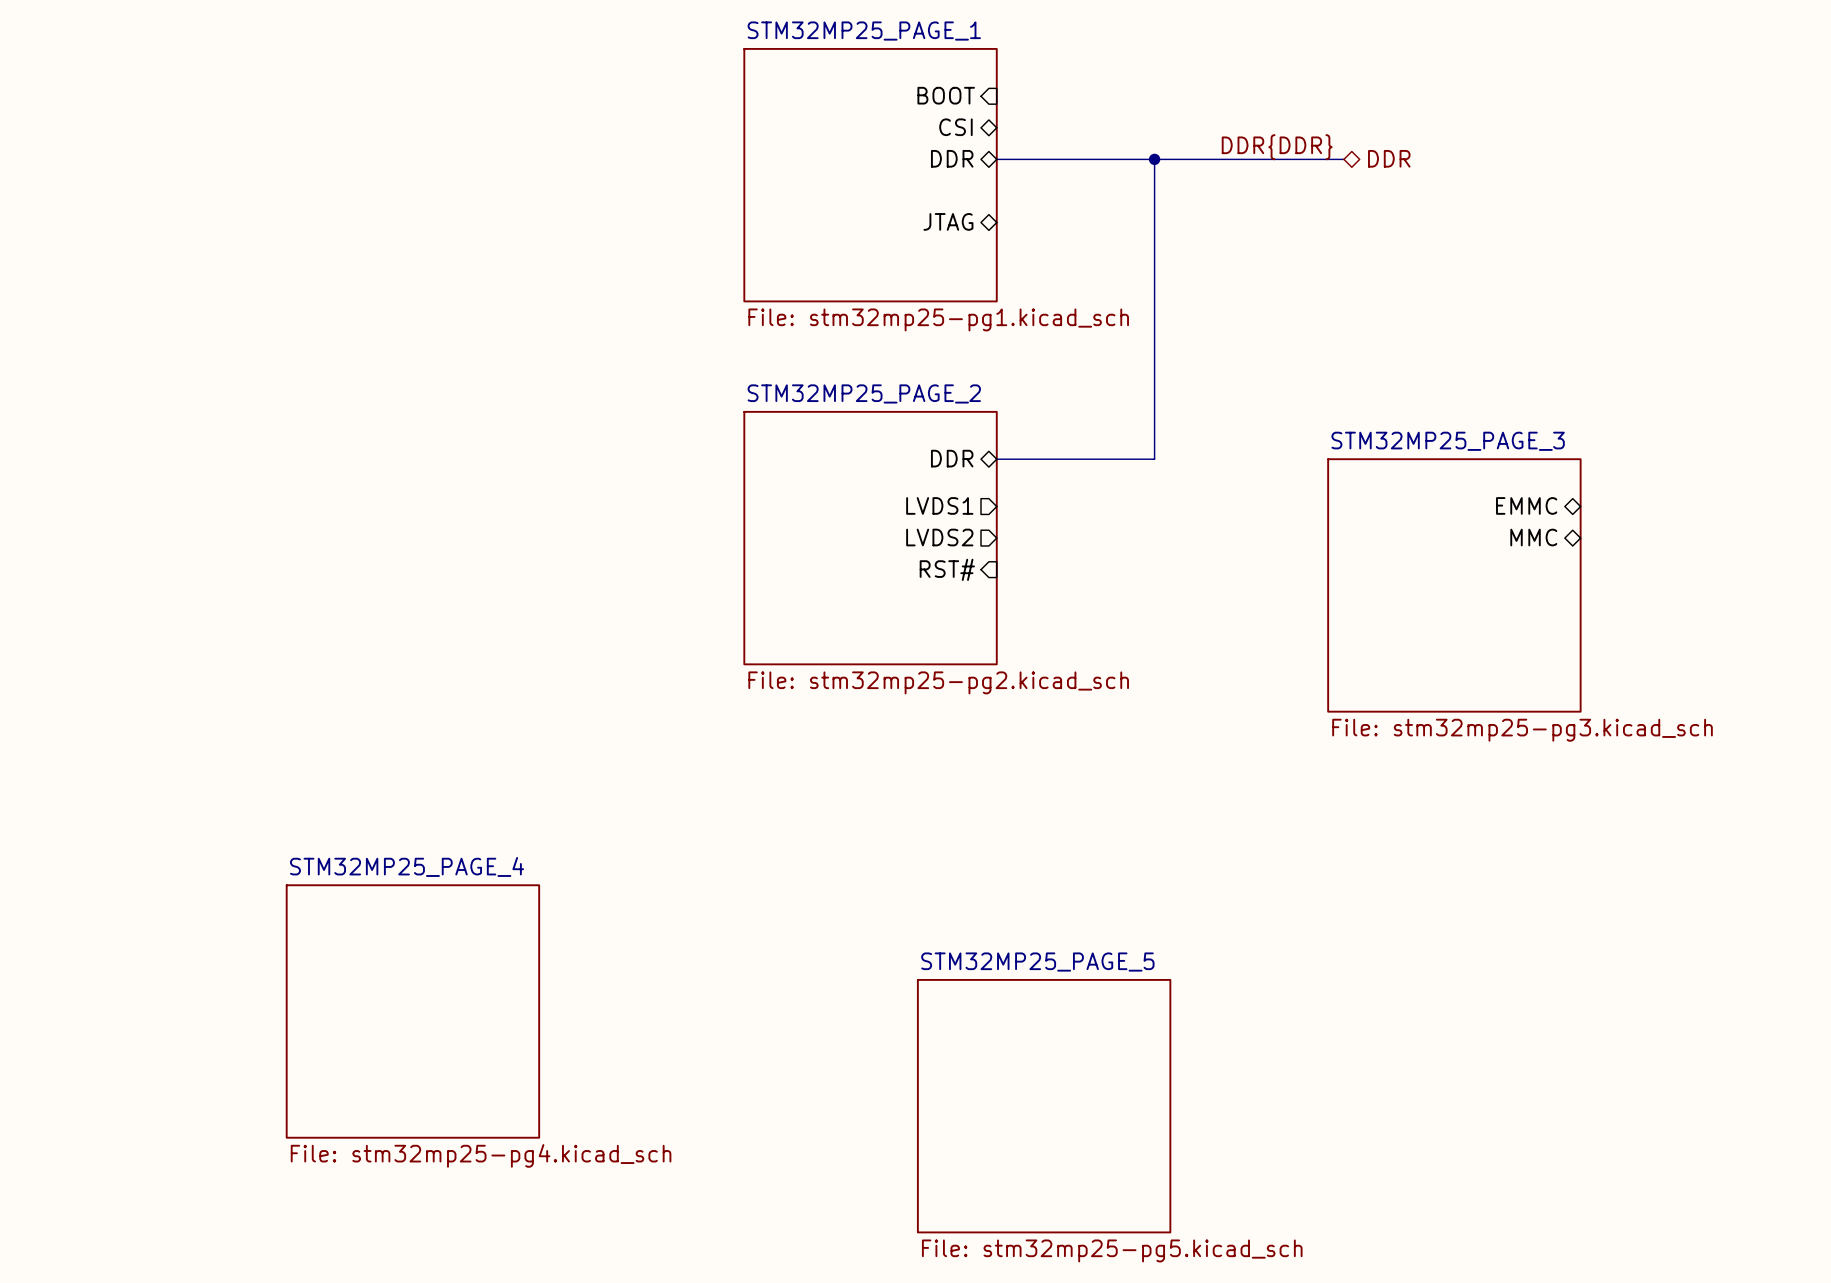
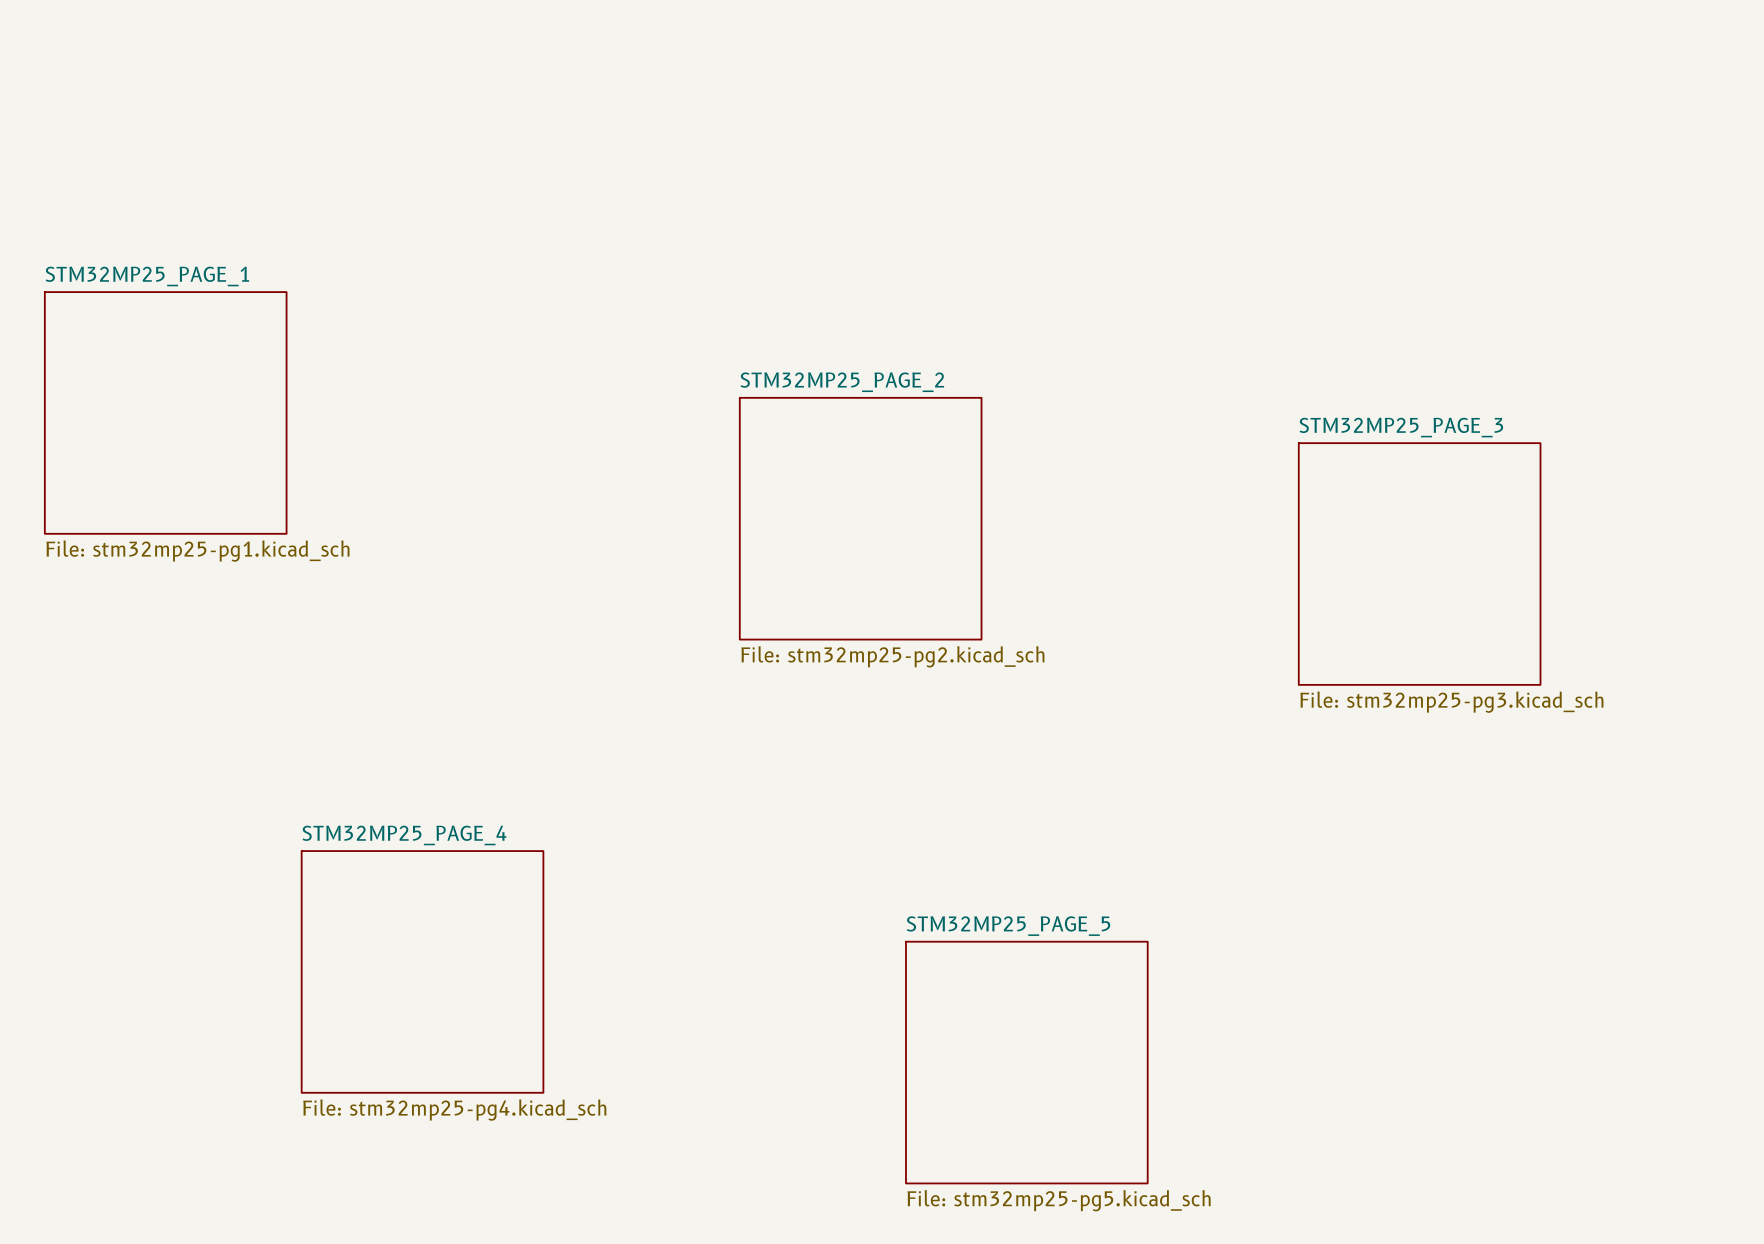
sheet pin: BOOT (946, 95) -> none
sheet pin: CSI (955, 127) -> none
label: DDR{DDR} (1277, 147) -> none
sheet pin: DDR (952, 158) -> none
hierarchical label: DDR (1389, 158) -> none
bus: (996, 159) (1343, 159) -> none
bus: (1154, 159) (1154, 459) (996, 459) -> none
junction: (1154, 159) -> none
sheet STM32MP25_PAGE_1 position: (870, 175) -> (165, 412)
sheet pin: JTAG (948, 221) -> none
sheet pin: DDR (952, 458) -> none
sheet pin: LVDS1 (939, 505) -> none
sheet pin: EMMC (1526, 505) -> none
sheet pin: LVDS2 (939, 537) -> none
sheet pin: MMC (1533, 537) -> none
sheet pin: RST# (947, 569) -> none

